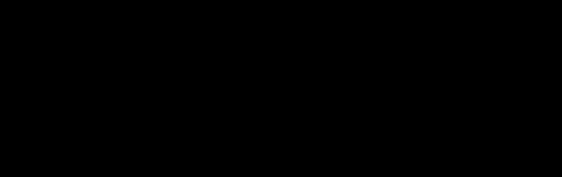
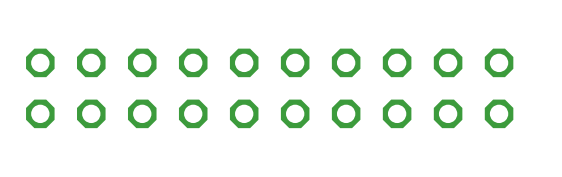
part: none -> (269, 88)

